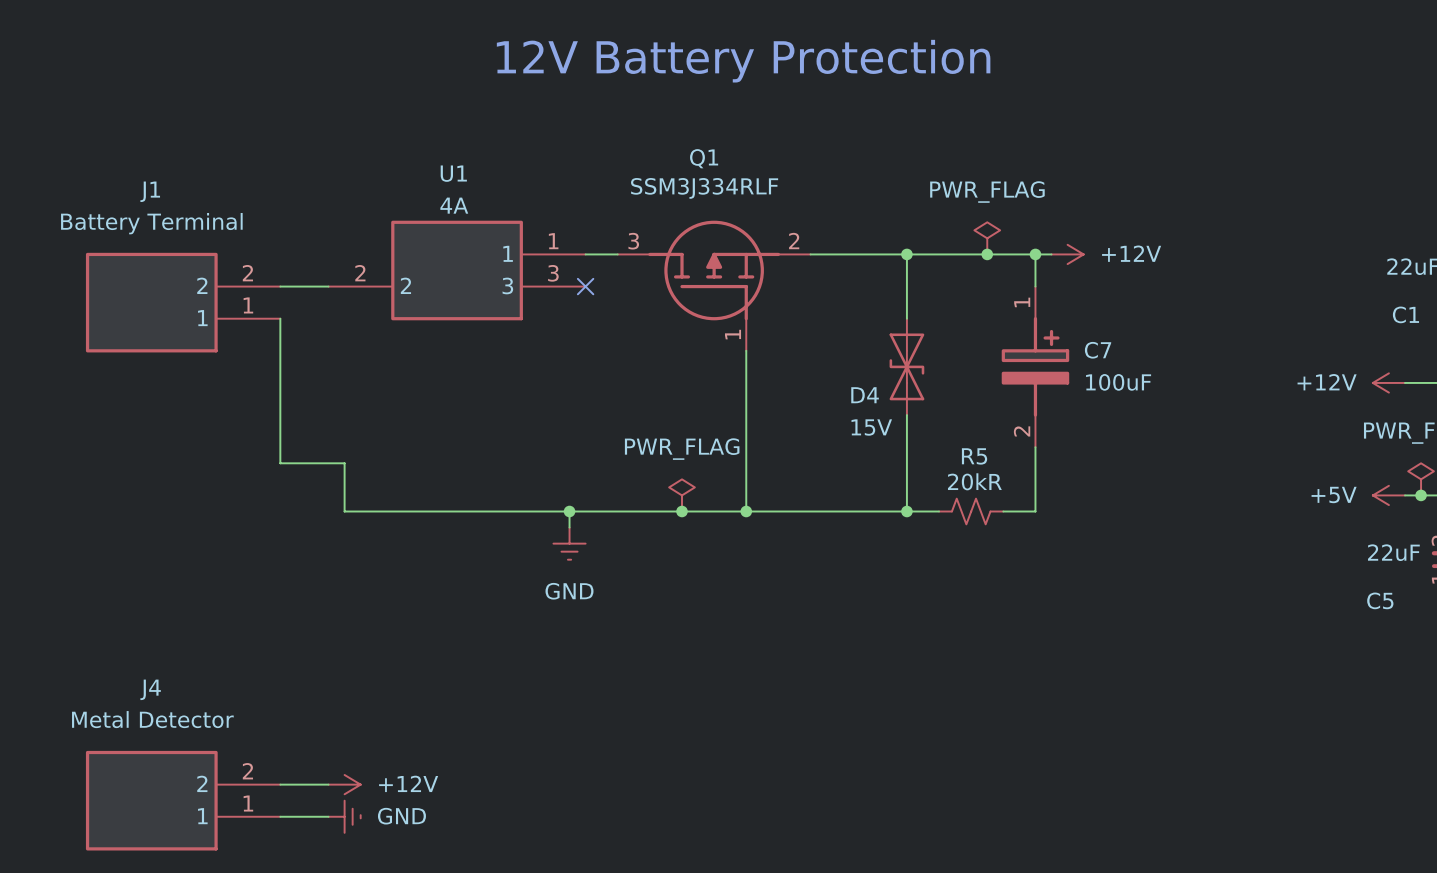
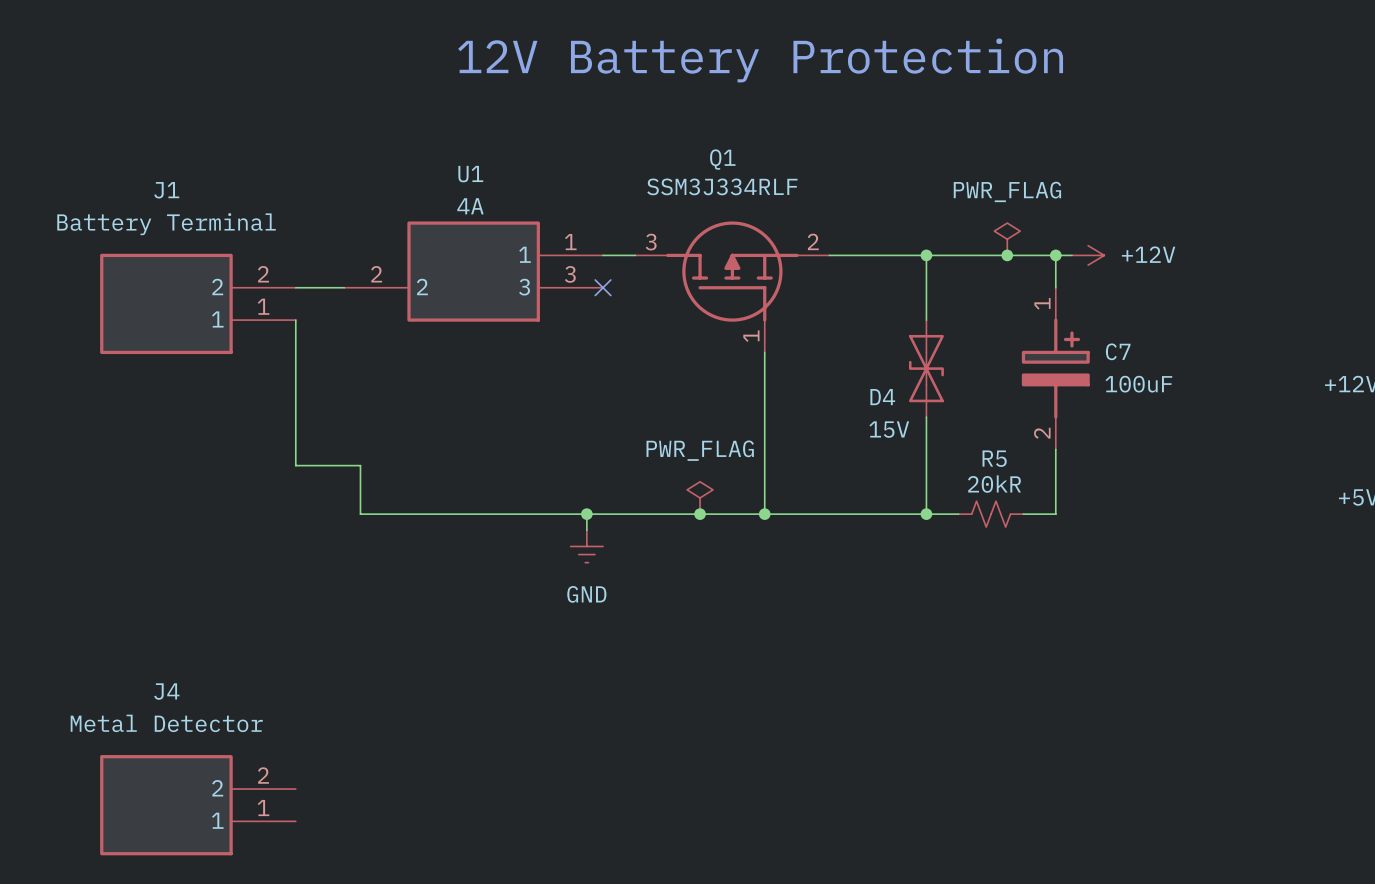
wire: (280, 784) (328, 784) -> none
power symbol: +12V (344, 784) -> none
wire: (280, 816) (328, 816) -> none
power symbol: GND (344, 816) -> none

